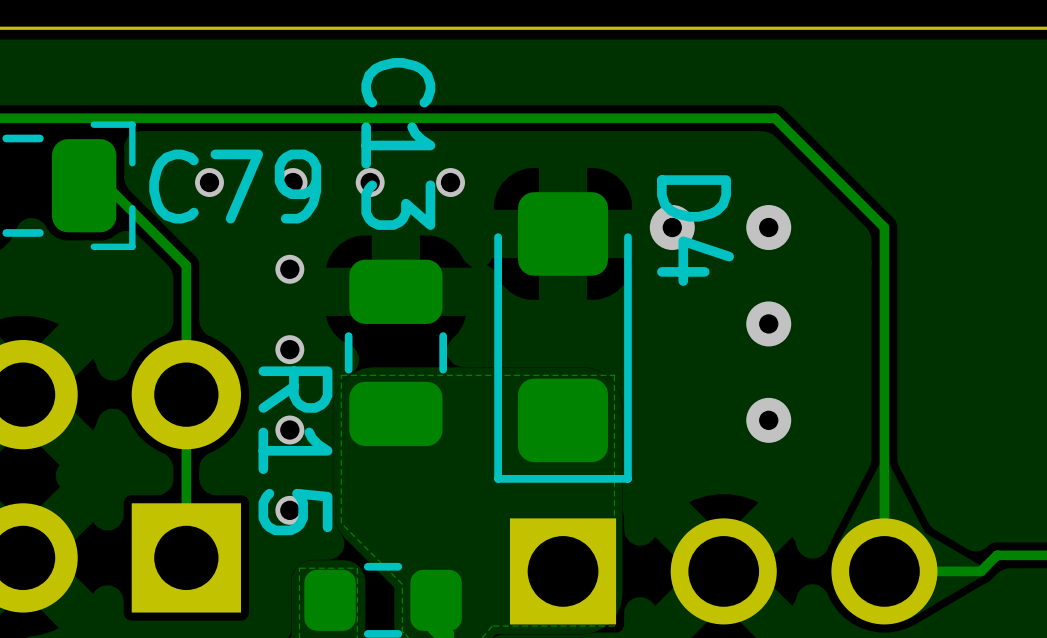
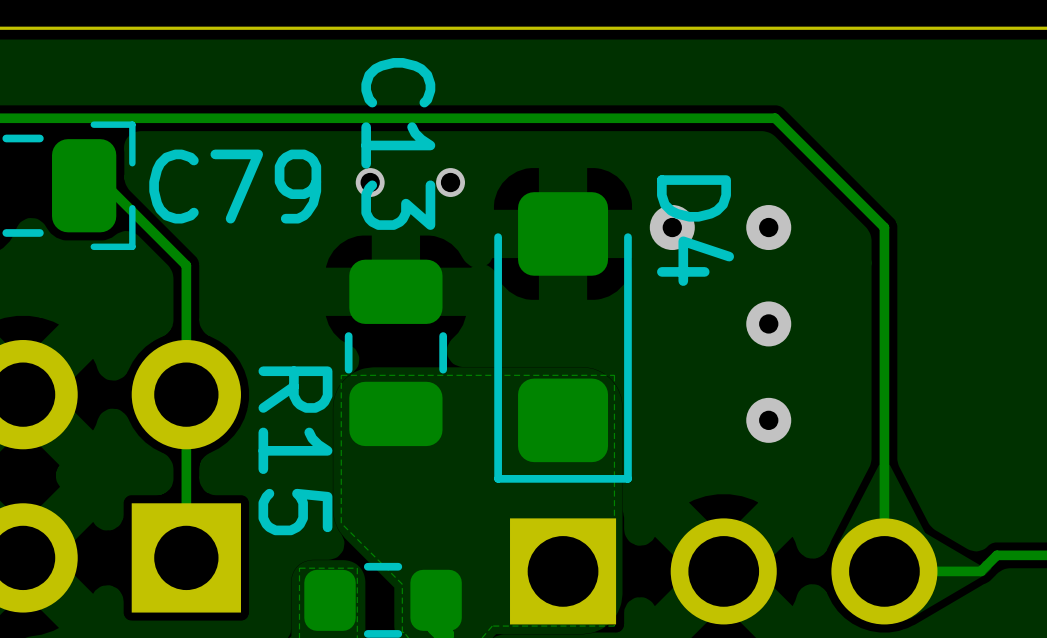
via: (209, 182) -> none
via: (293, 182) -> none
via: (289, 269) -> none
via: (289, 349) -> none
via: (289, 430) -> none
via: (289, 510) -> none

